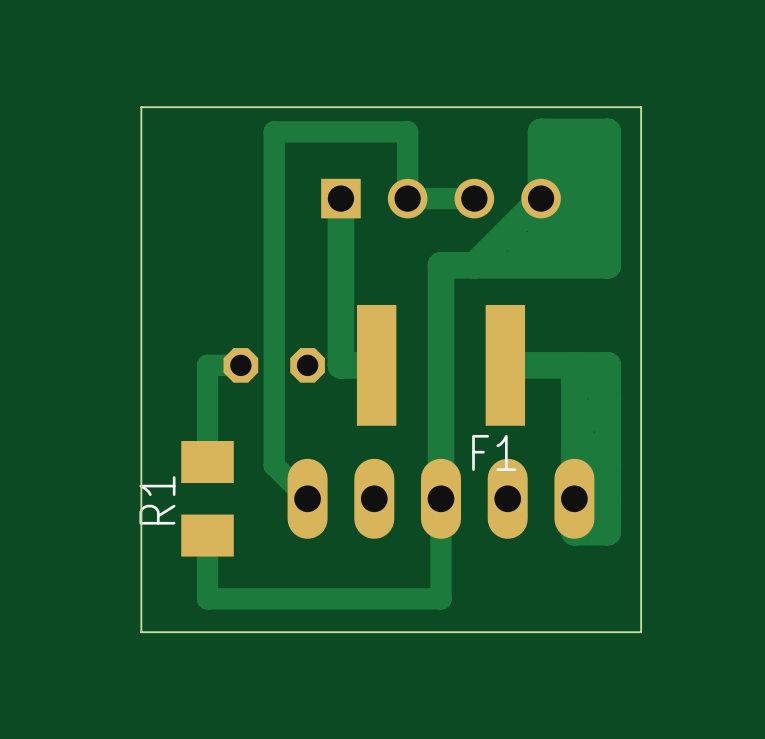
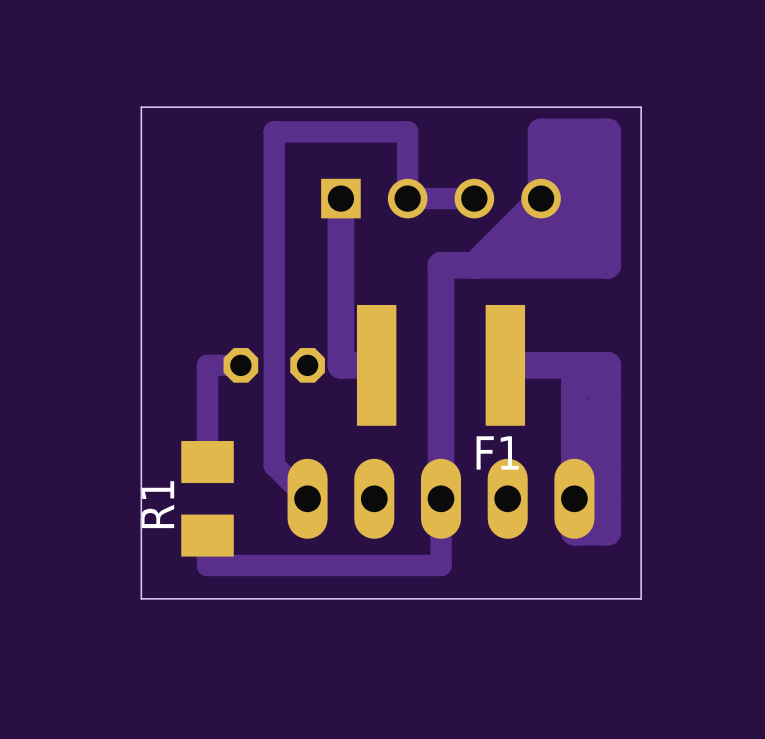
track: (441, 565) (441, 598) (207, 598) (207, 565) -> (441, 565) (207, 565)
board edge: (641, 598) (641, 632) (141, 632) (141, 598) -> (641, 598) (141, 598)

